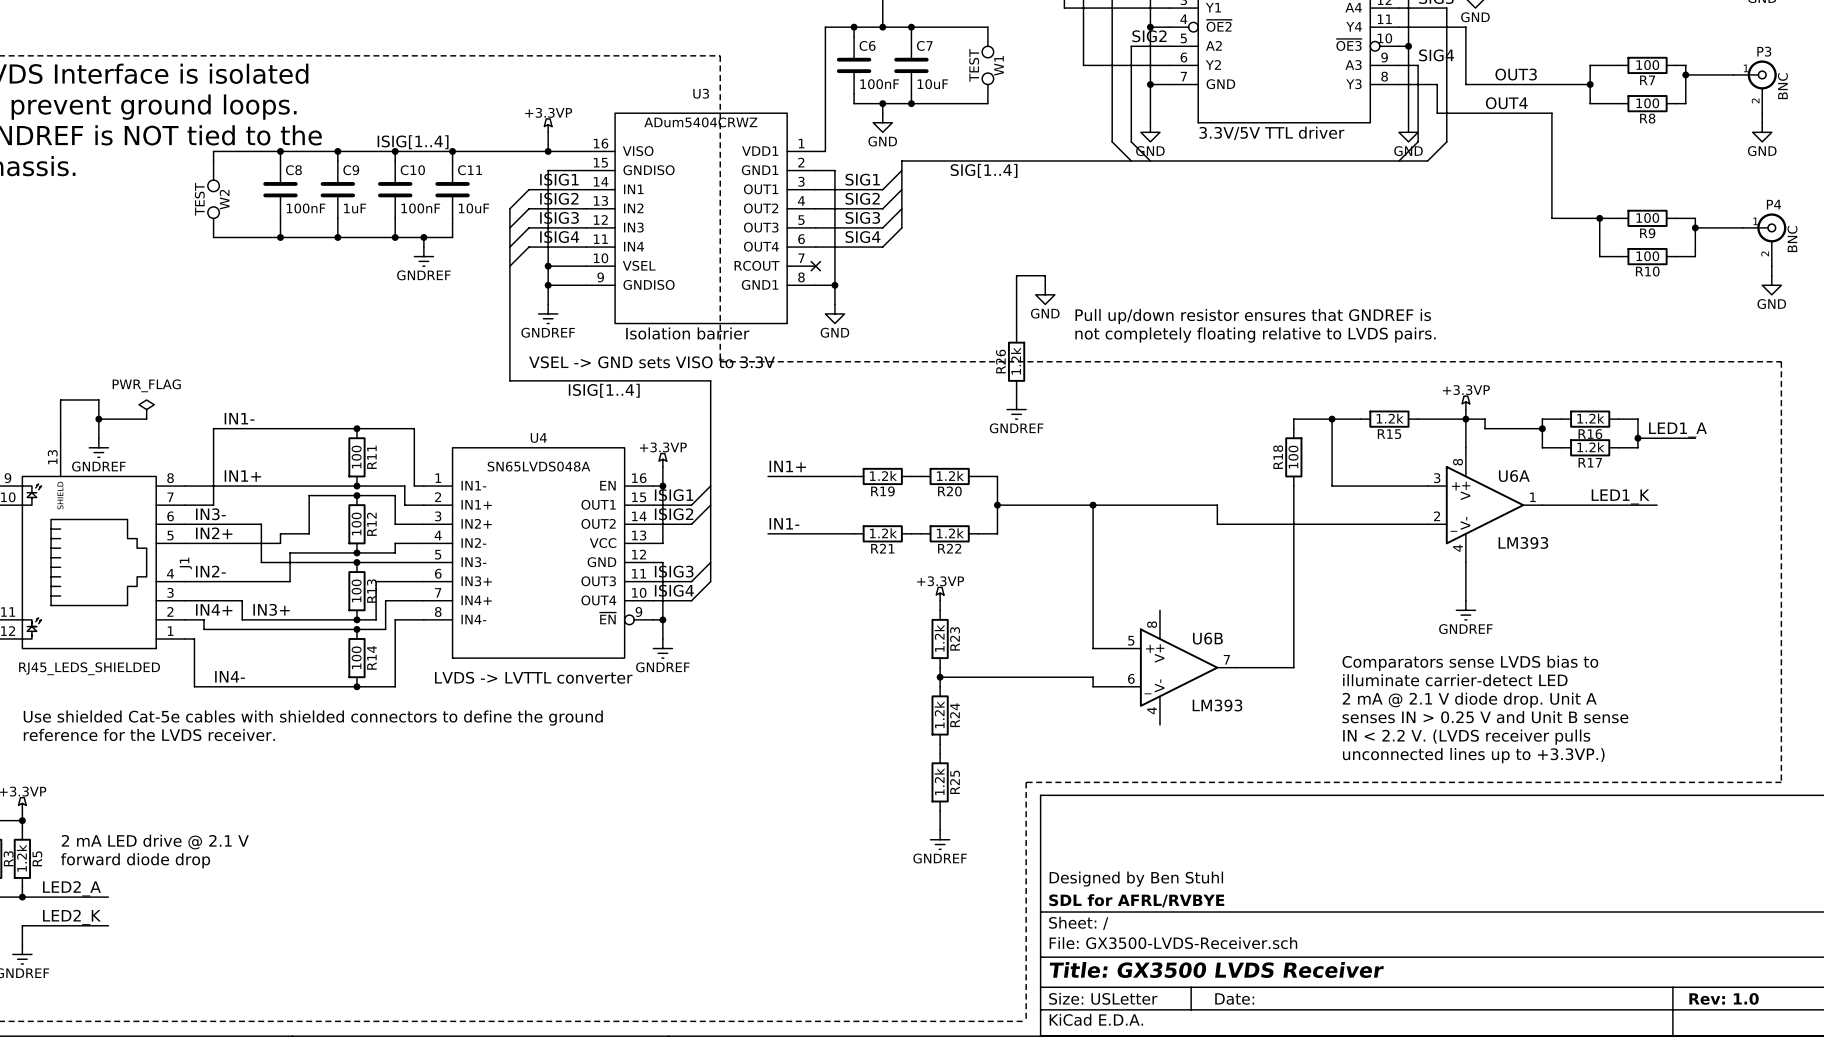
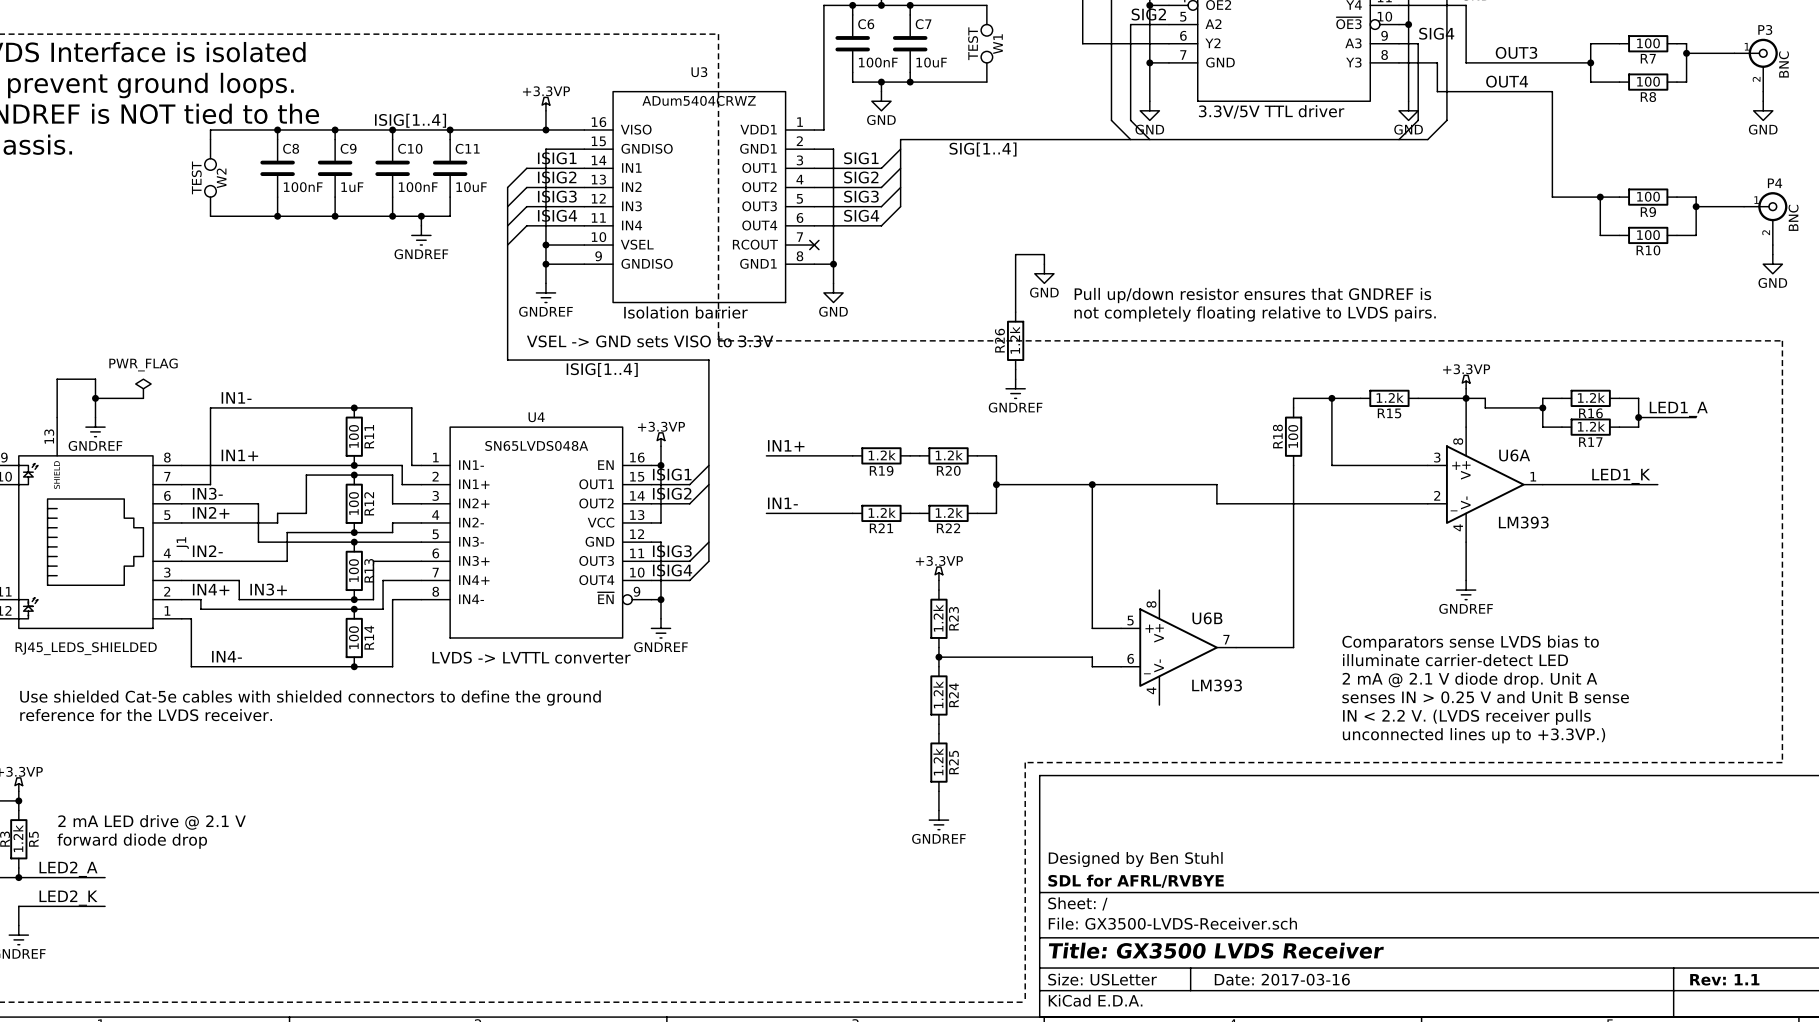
title block: Rev: 1.0 (1724, 998) -> Rev: 1.1 (1724, 979)
title block: Date: (1234, 999) -> Date: 2017-03-16 (1282, 979)

